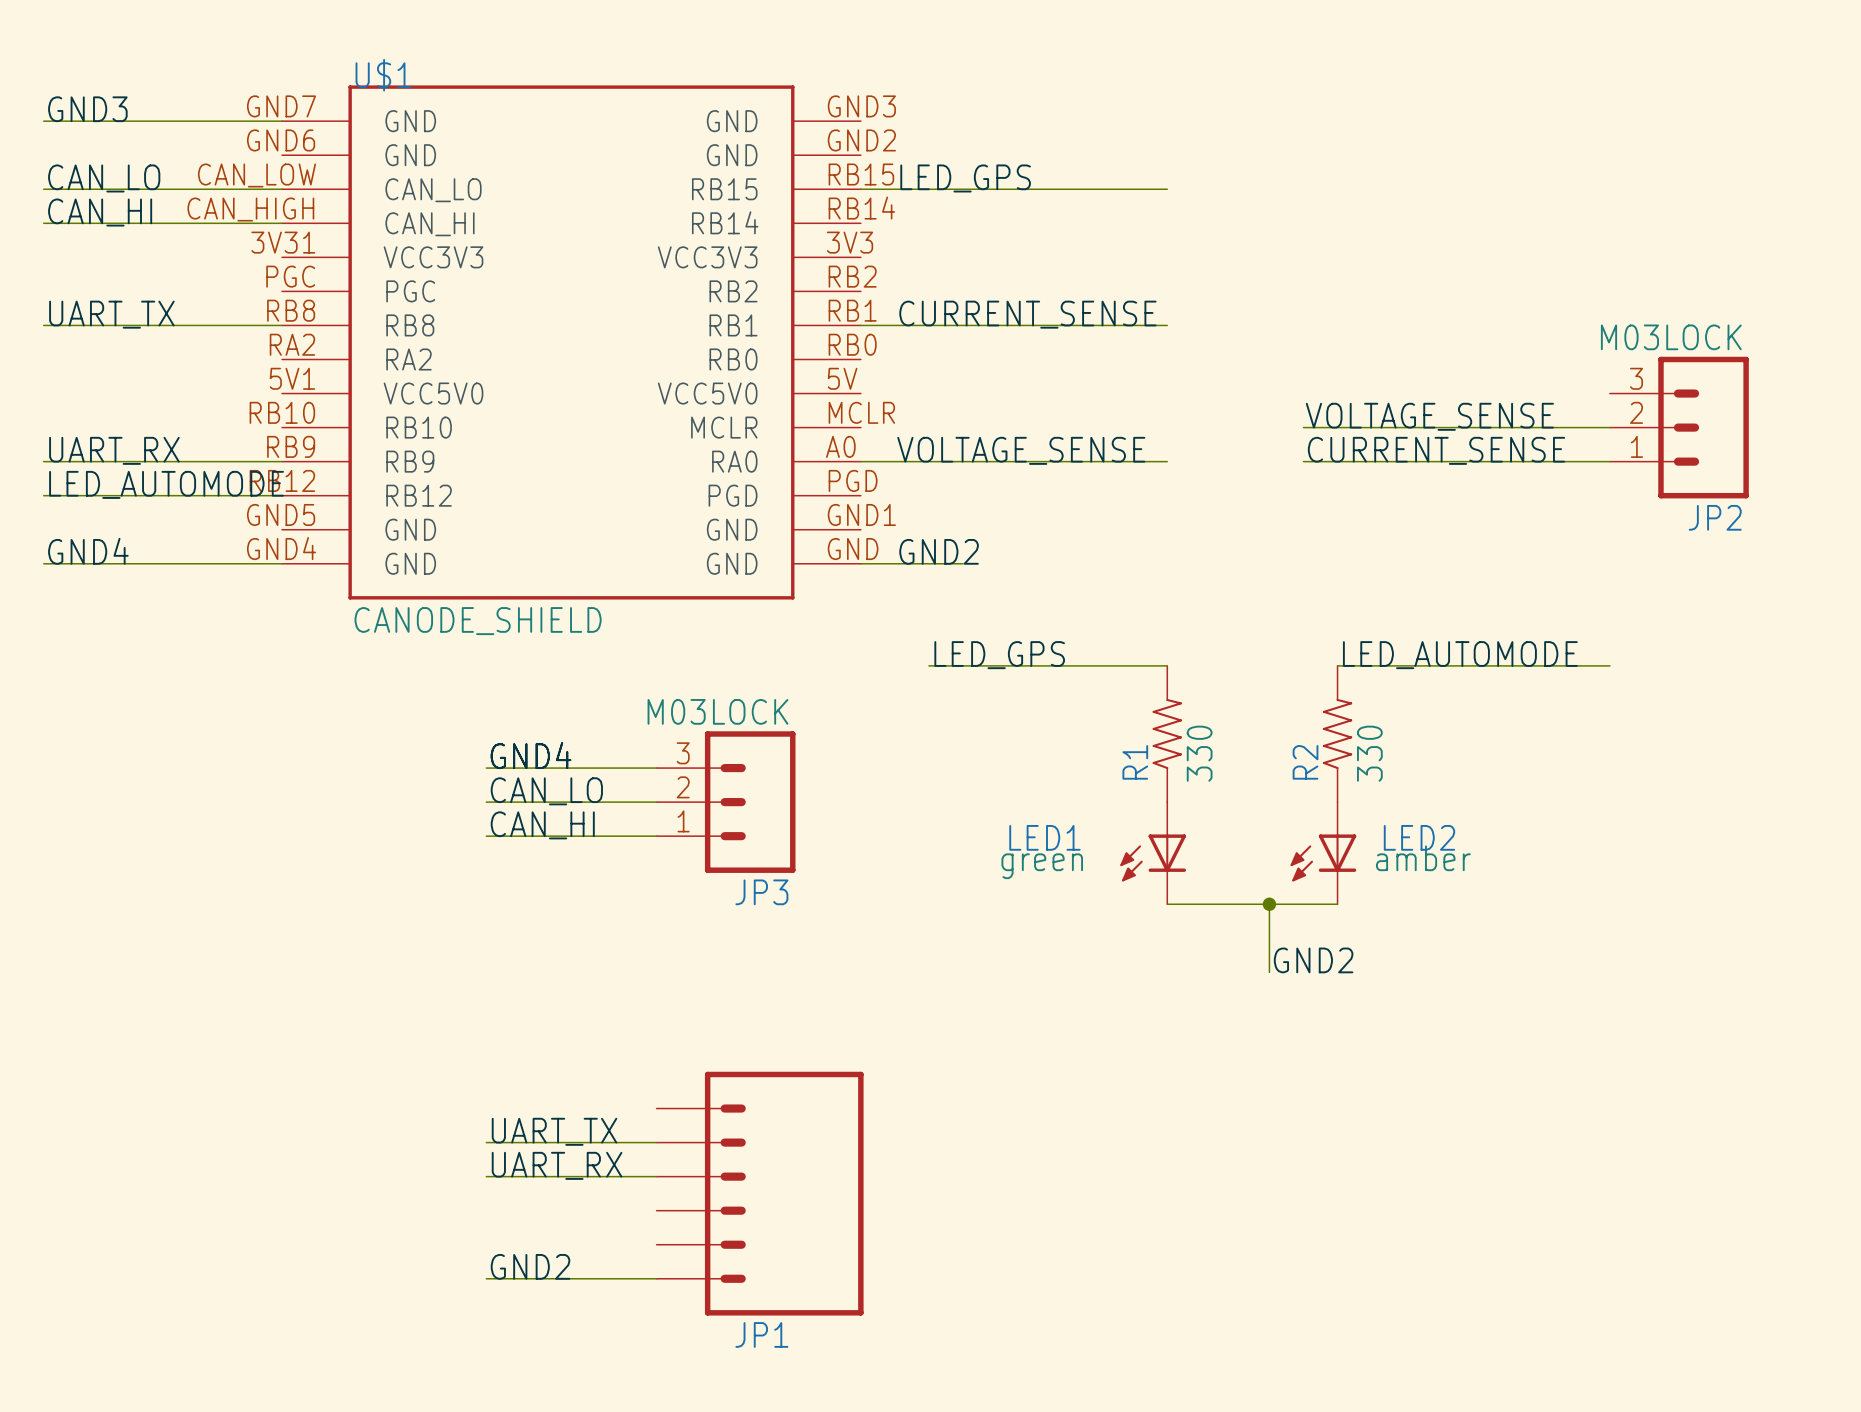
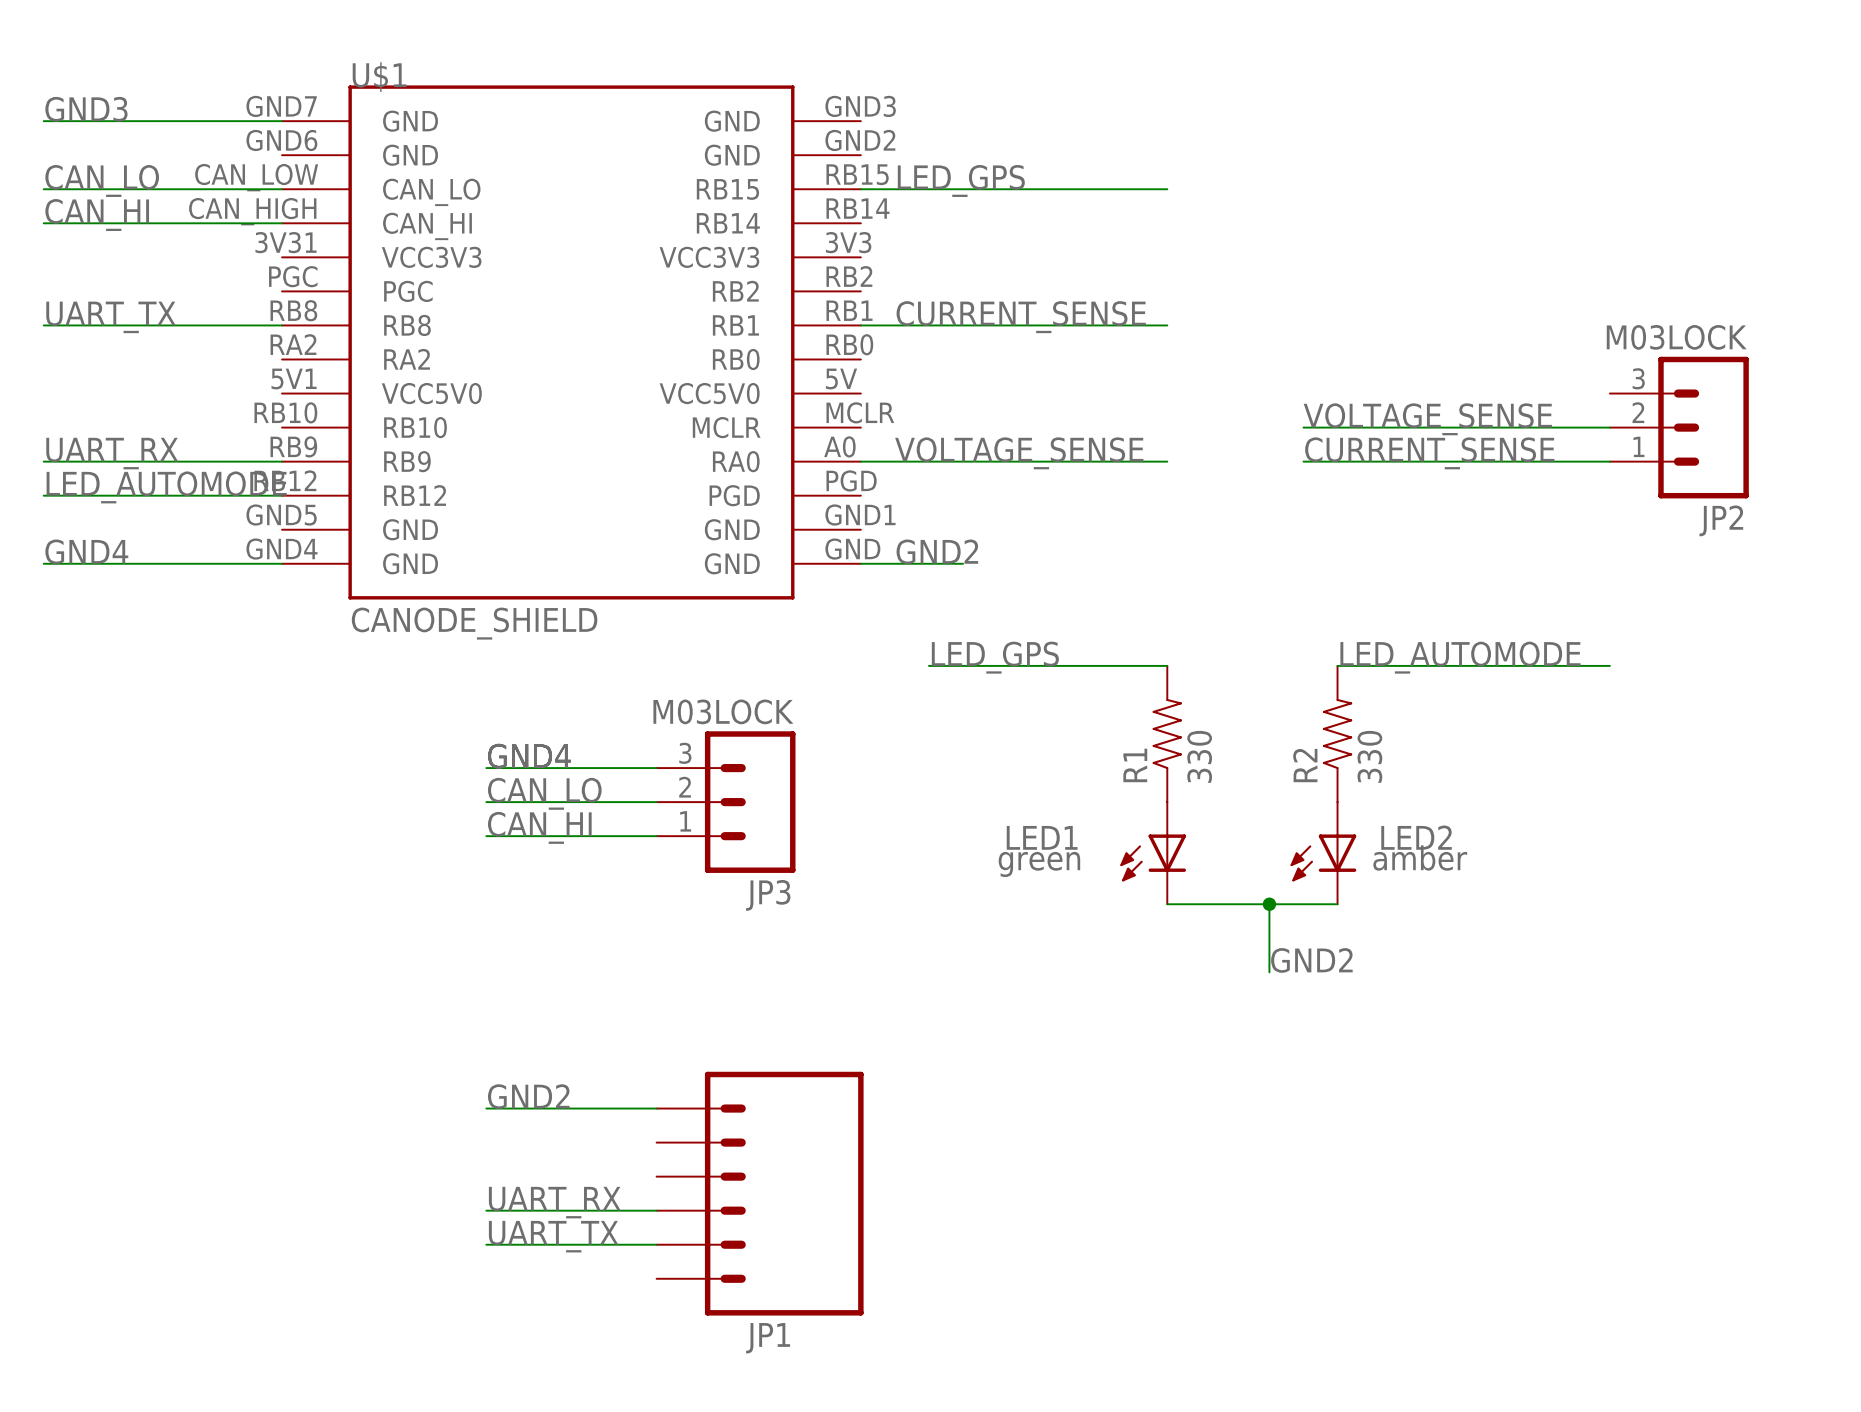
label position: UART_TX (554, 1131) -> UART_TX (553, 1236)
wire: (486, 1142) (656, 1142) -> (486, 1108) (656, 1108)
label position: UART_RX (557, 1165) -> UART_RX (554, 1202)
wire: (486, 1176) (656, 1176) -> (486, 1210) (656, 1210)
label position: GND2 (530, 1266) -> GND2 (528, 1096)
wire: (486, 1278) (656, 1278) -> (486, 1244) (656, 1244)

